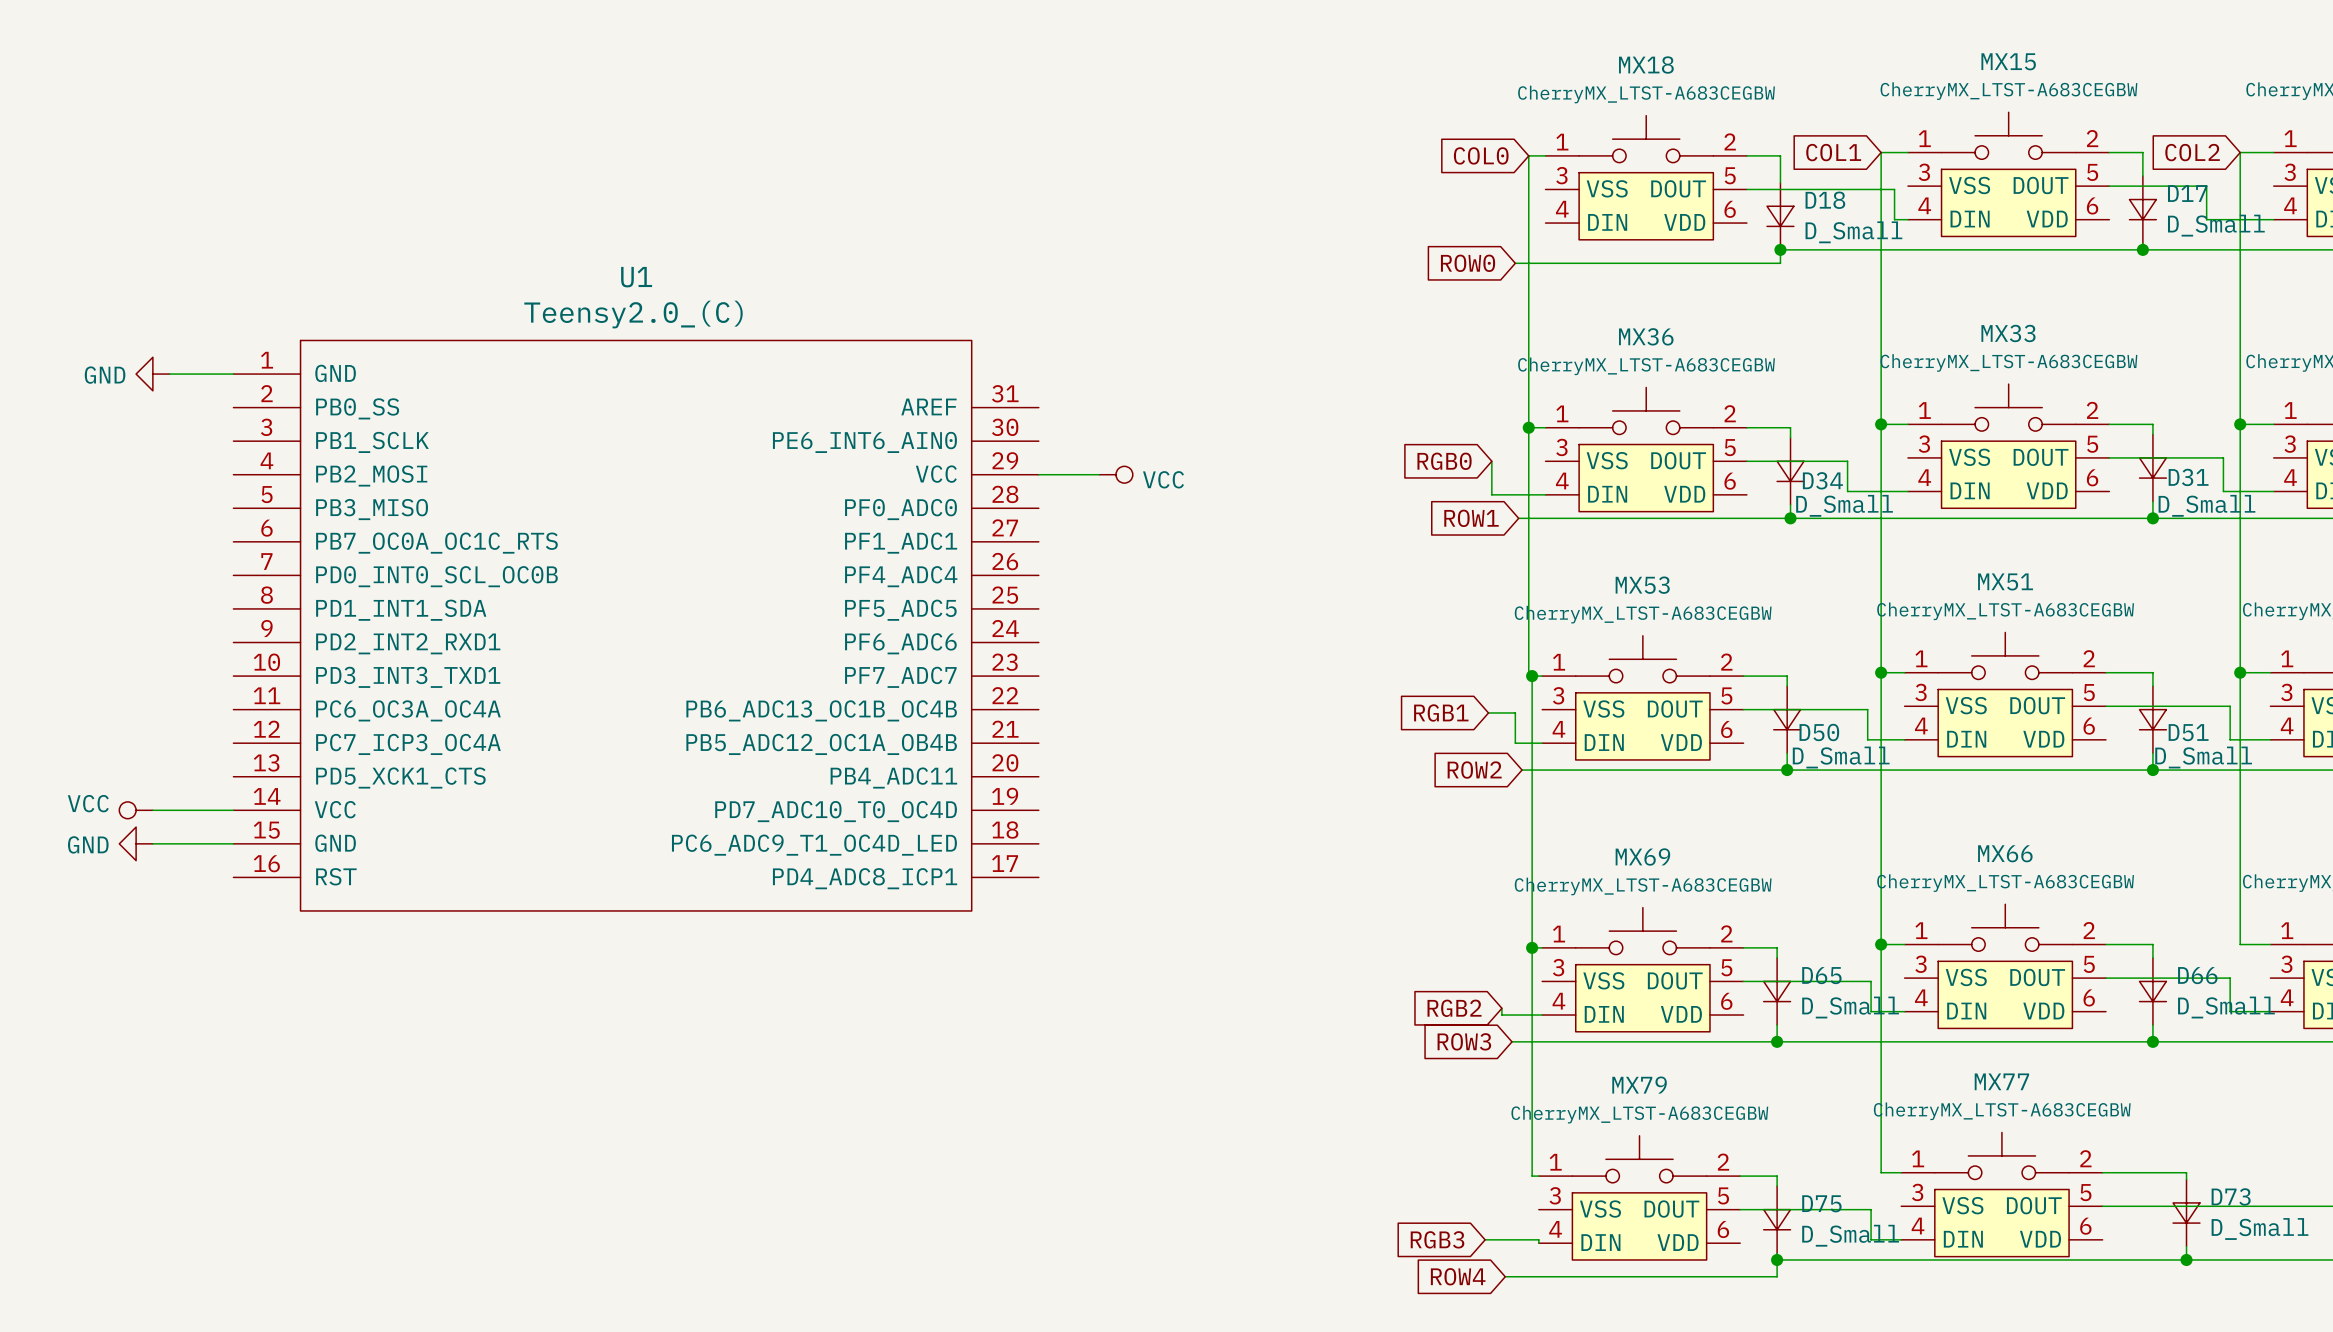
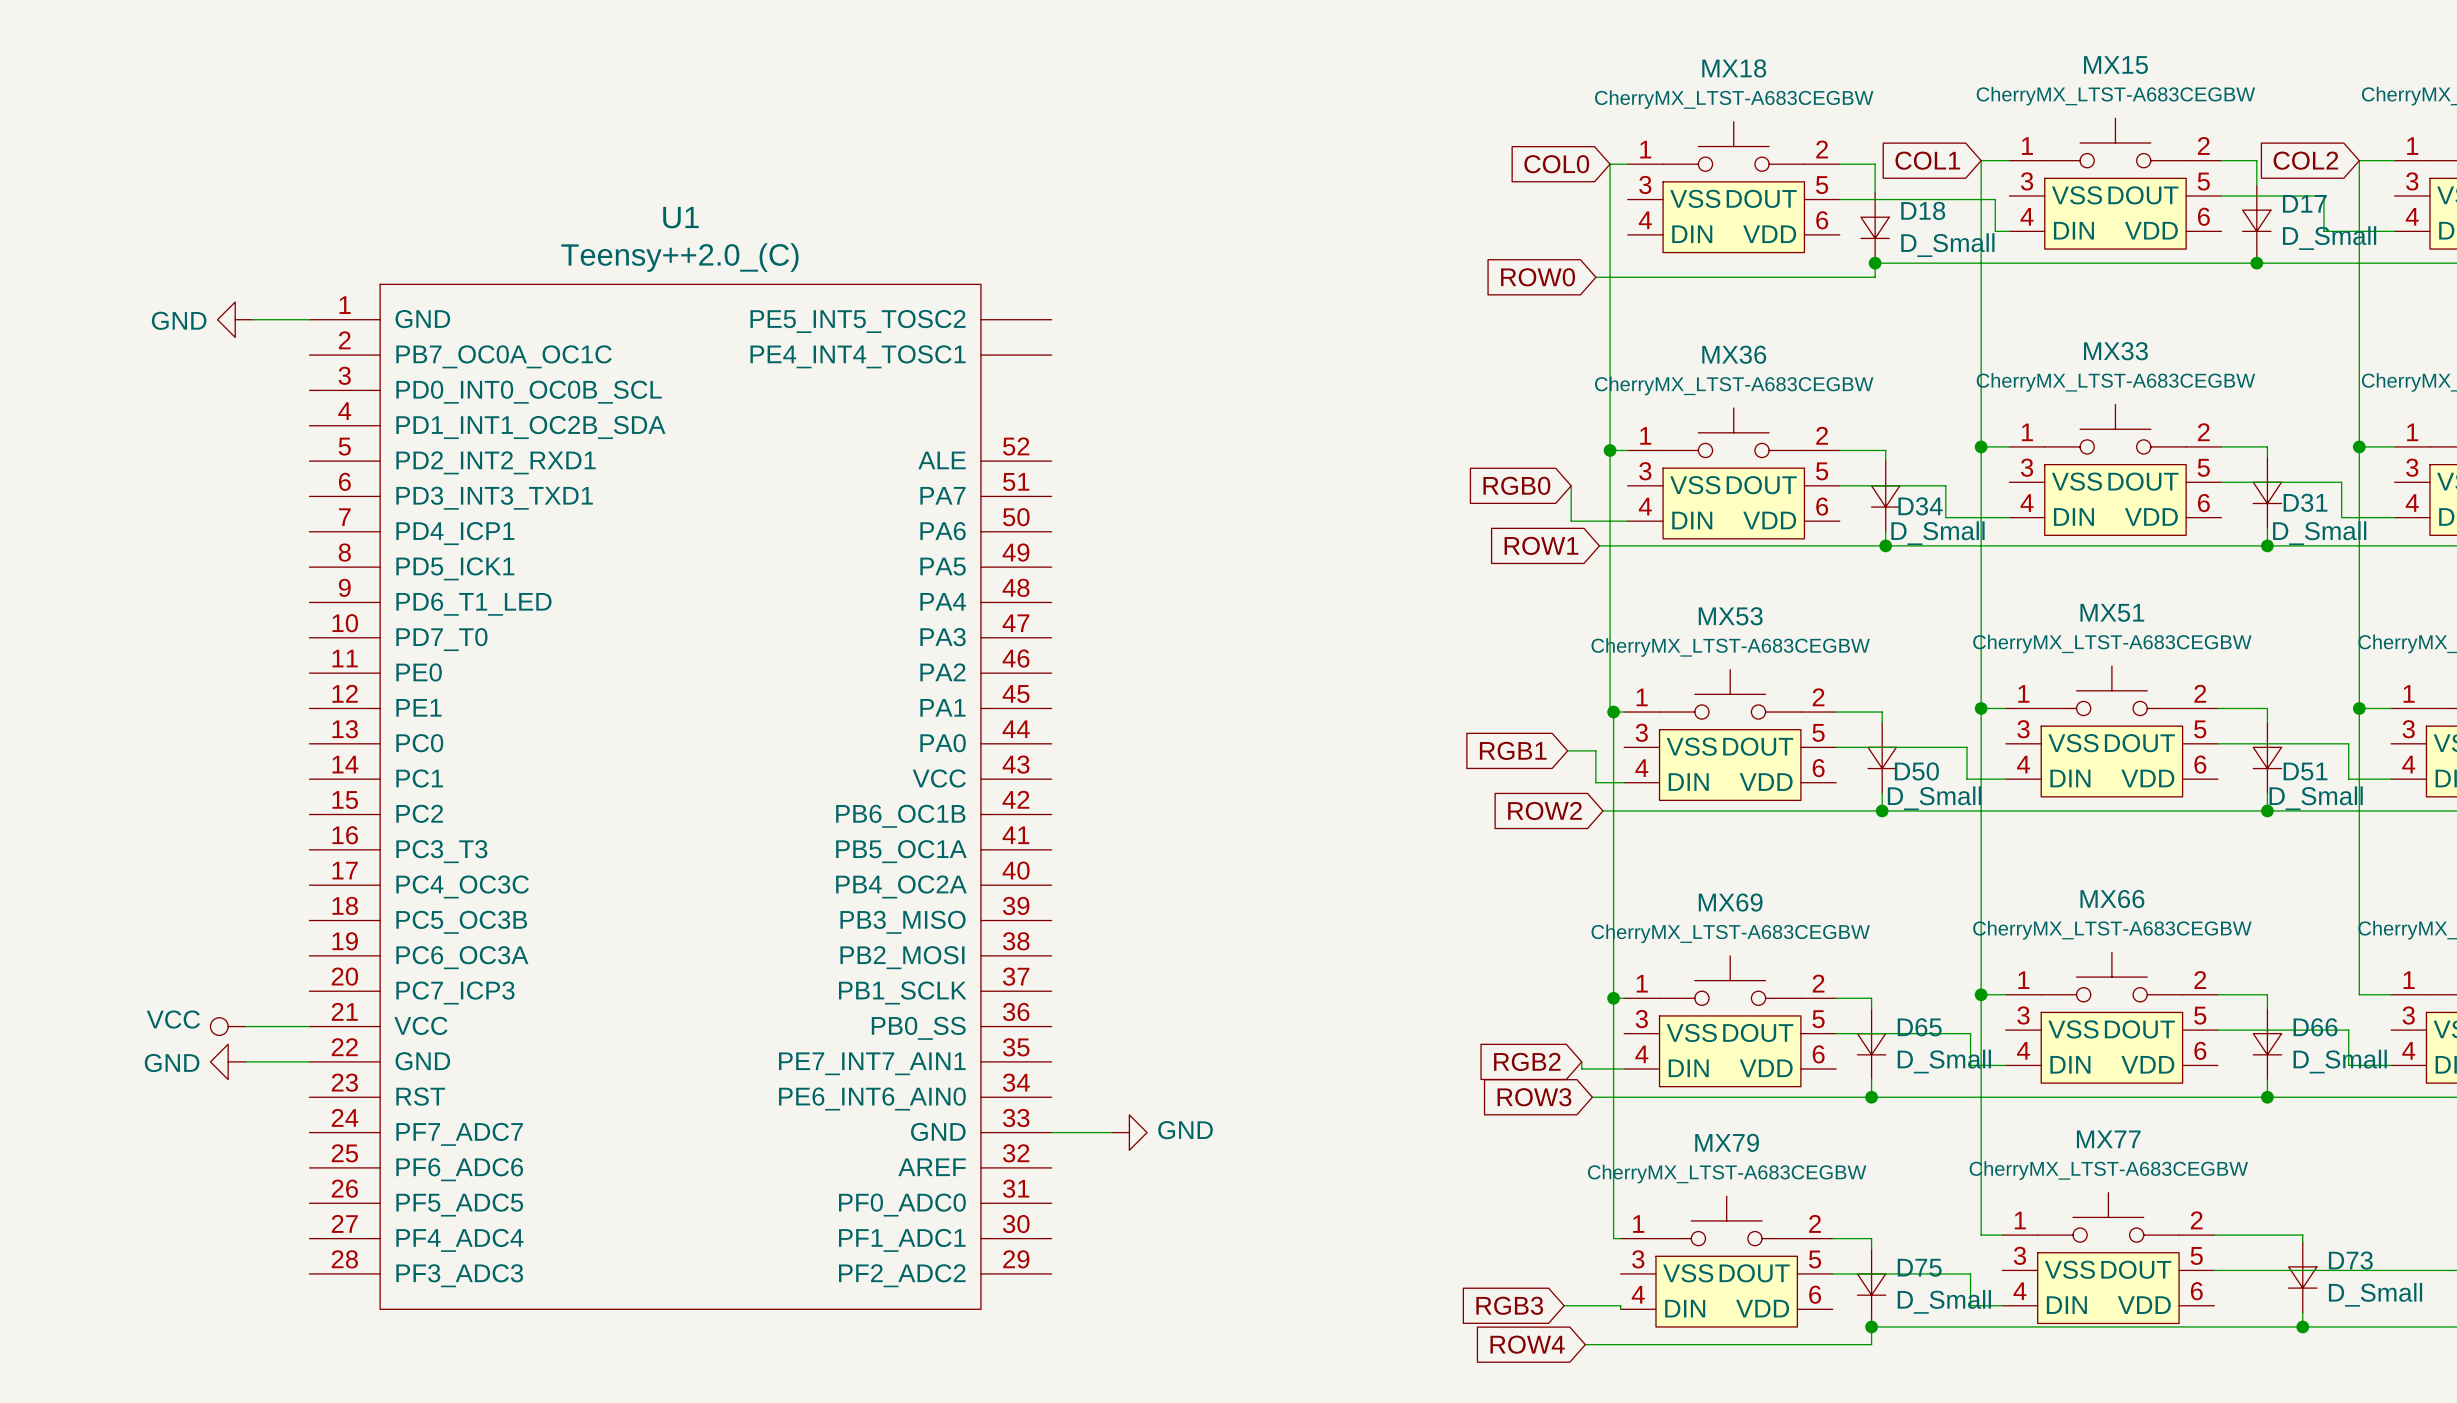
U1 name position: U1 (636, 277) -> U1 (680, 217)
wire: none -> (252, 319) (309, 319)
U1 value: Teensy2.0_(C) (633, 314) -> Teensy++2.0_(C) (679, 257)
U1 symbol: [233, 340, 1039, 911] -> [309, 284, 1052, 1310]
power symbol position: GND (152, 374) -> GND (235, 319)
wire: (169, 374) (233, 374) -> none
wire: (1038, 474) (1099, 474) -> none
power symbol: VCC (1116, 474) -> none
power symbol position: VCC (136, 810) -> VCC (228, 1026)
wire: (152, 810) (233, 810) -> none
power symbol position: GND (136, 843) -> GND (228, 1061)
wire: (152, 843) (233, 843) -> none
wire: none -> (245, 1026) (309, 1026)
wire: none -> (245, 1061) (309, 1061)
wire: none -> (1051, 1132) (1111, 1132)
power symbol: none -> GND (1129, 1132)

